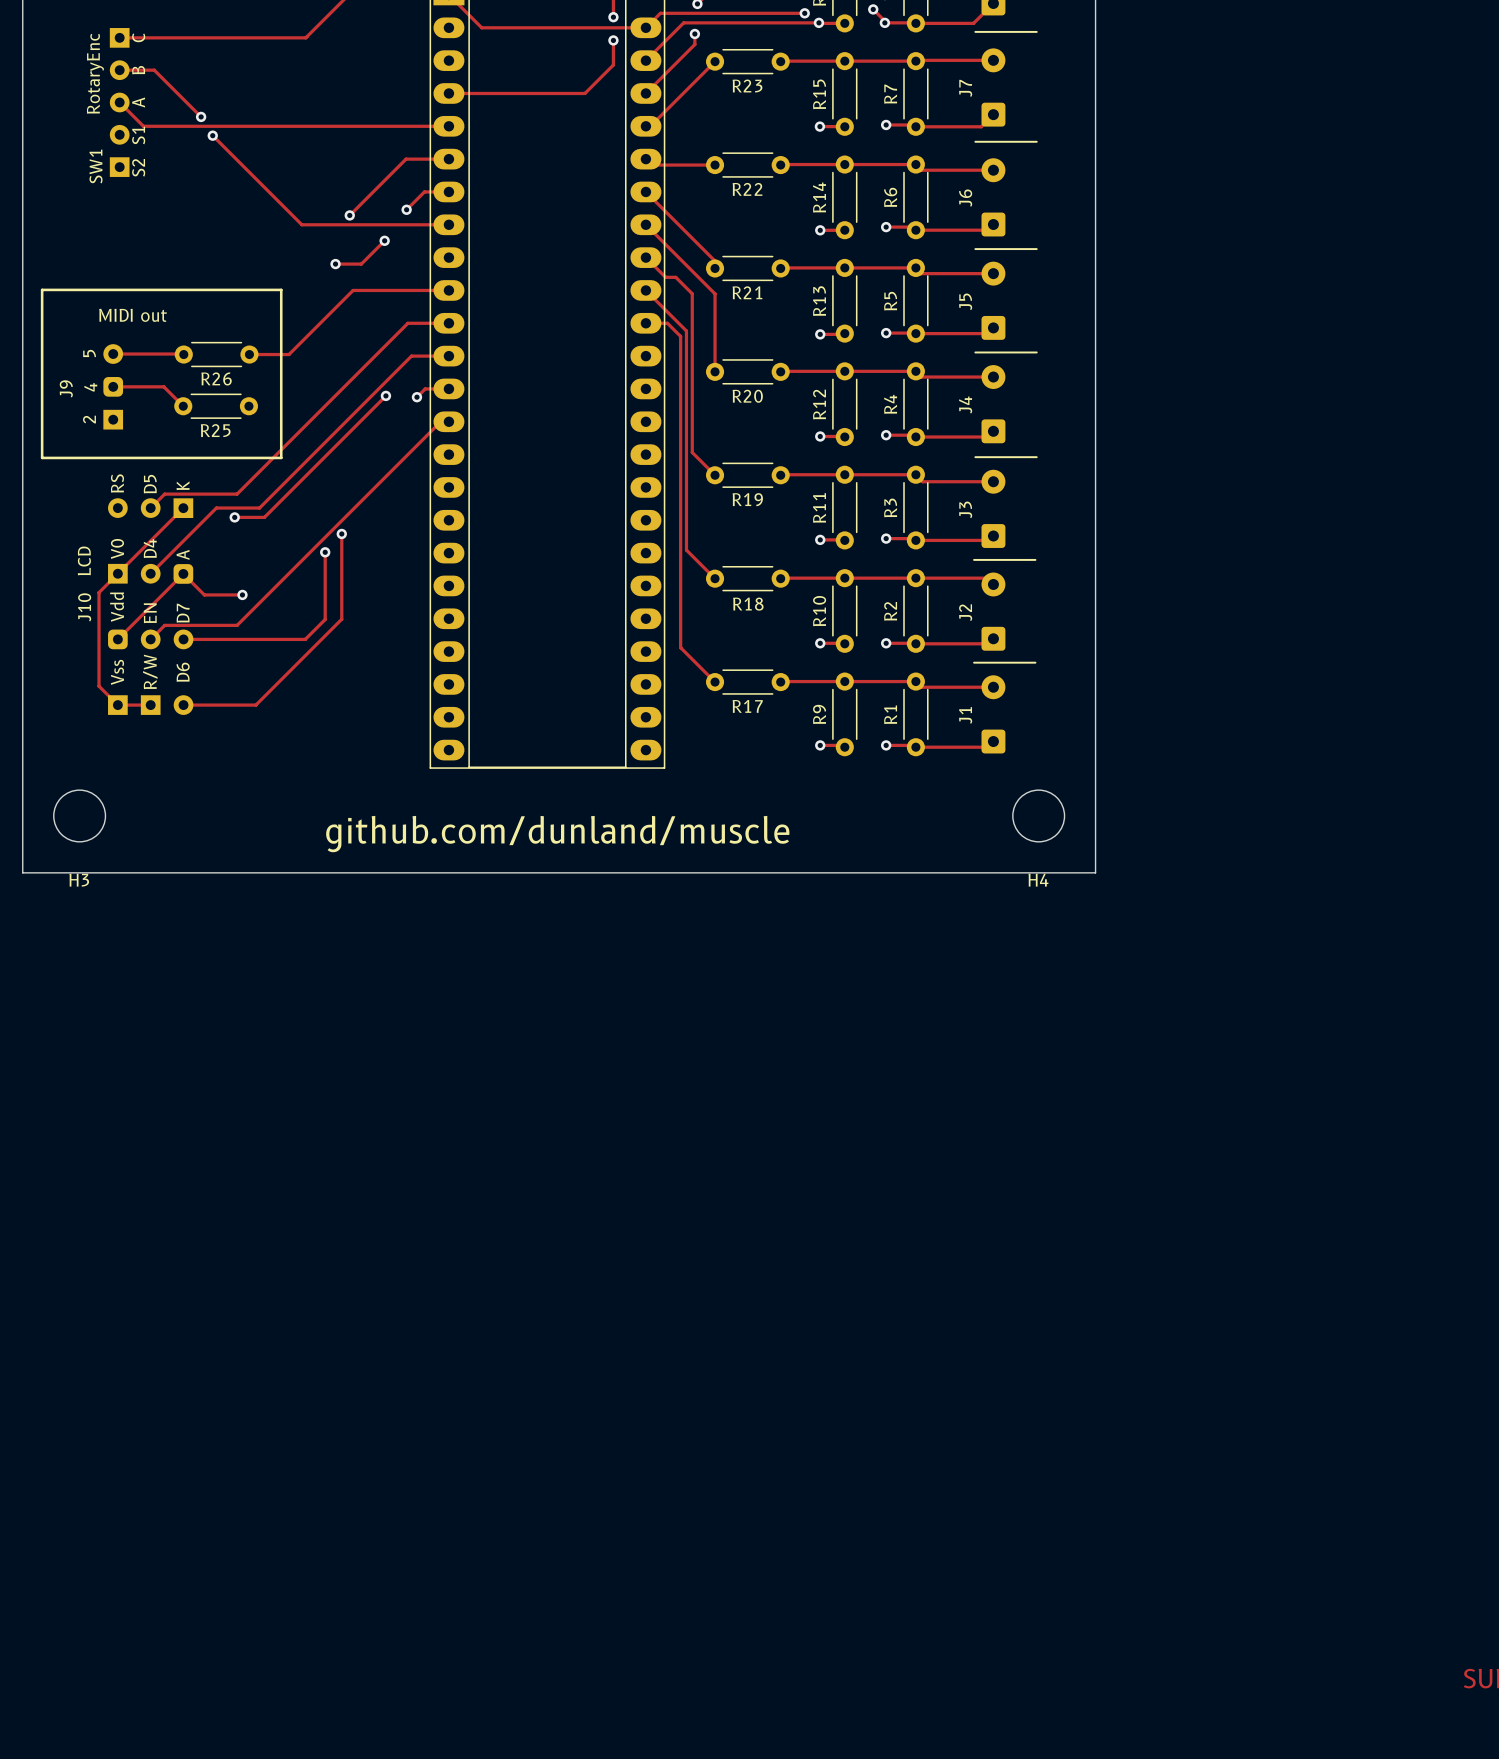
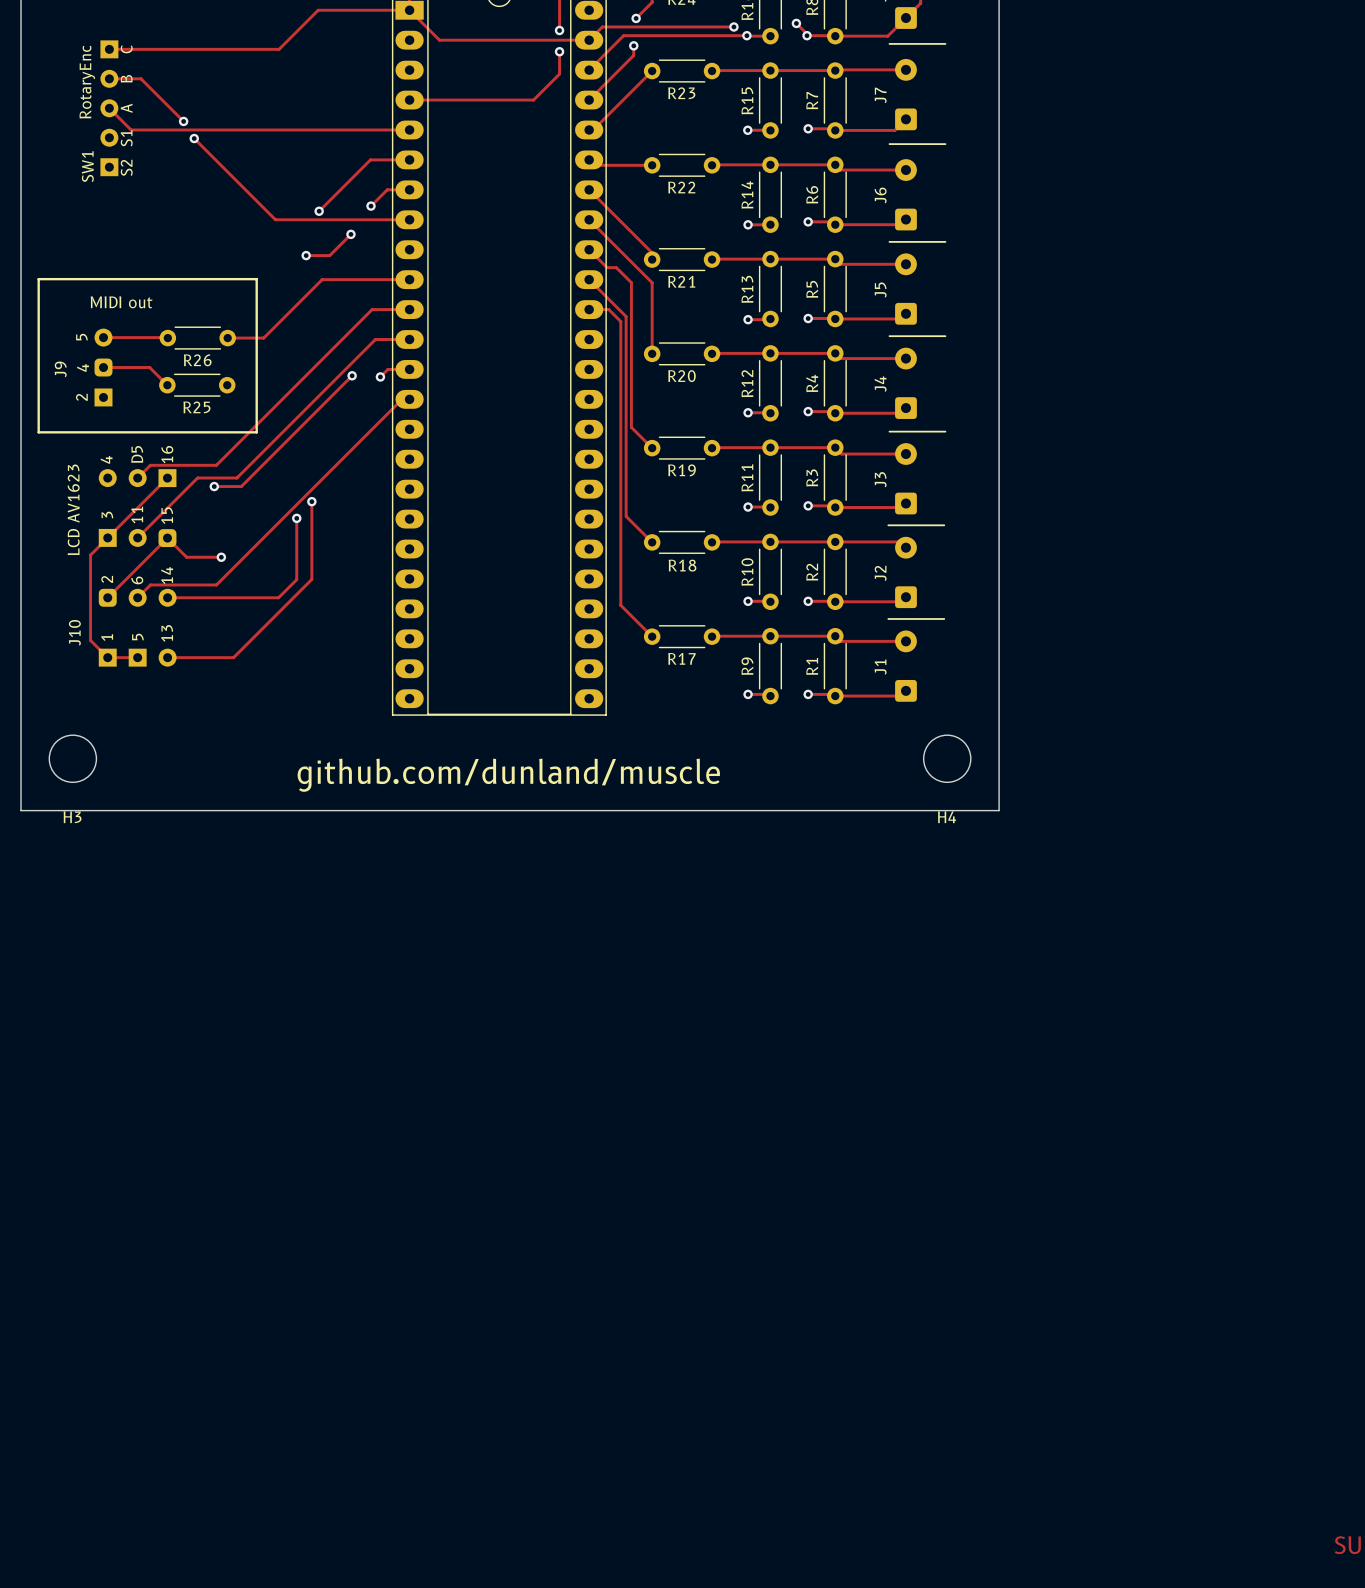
J10 footprint: [108, 498, 194, 715] -> [98, 469, 177, 667]
text: none -> LCD AV1623 (73, 509)
text: LCD (84, 560) -> none
J10 name position: J10 (84, 607) -> J10 (74, 632)

